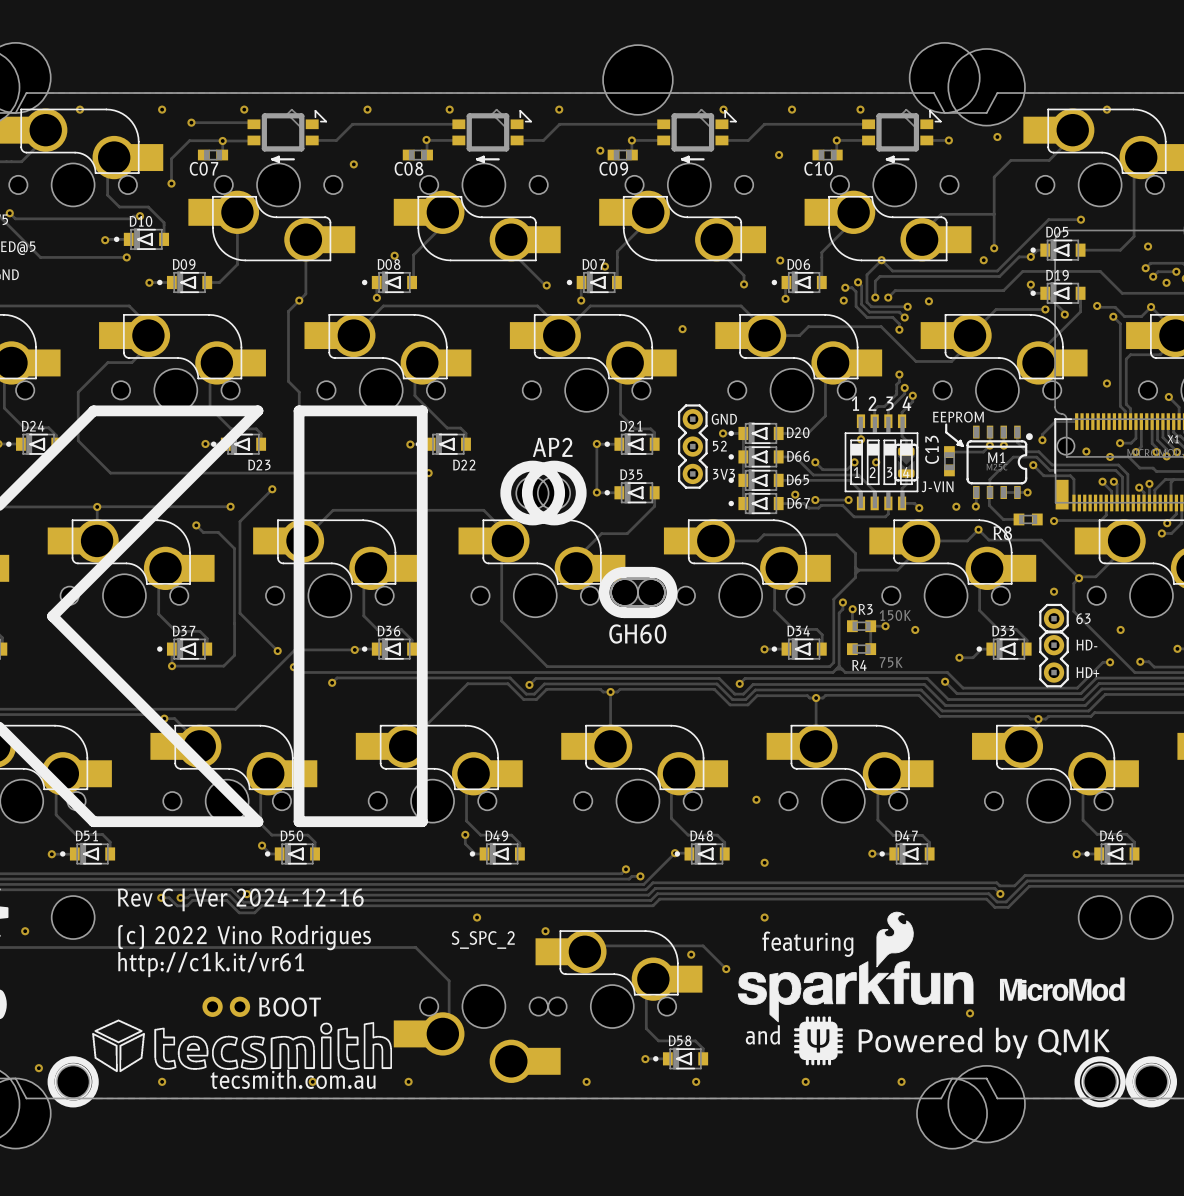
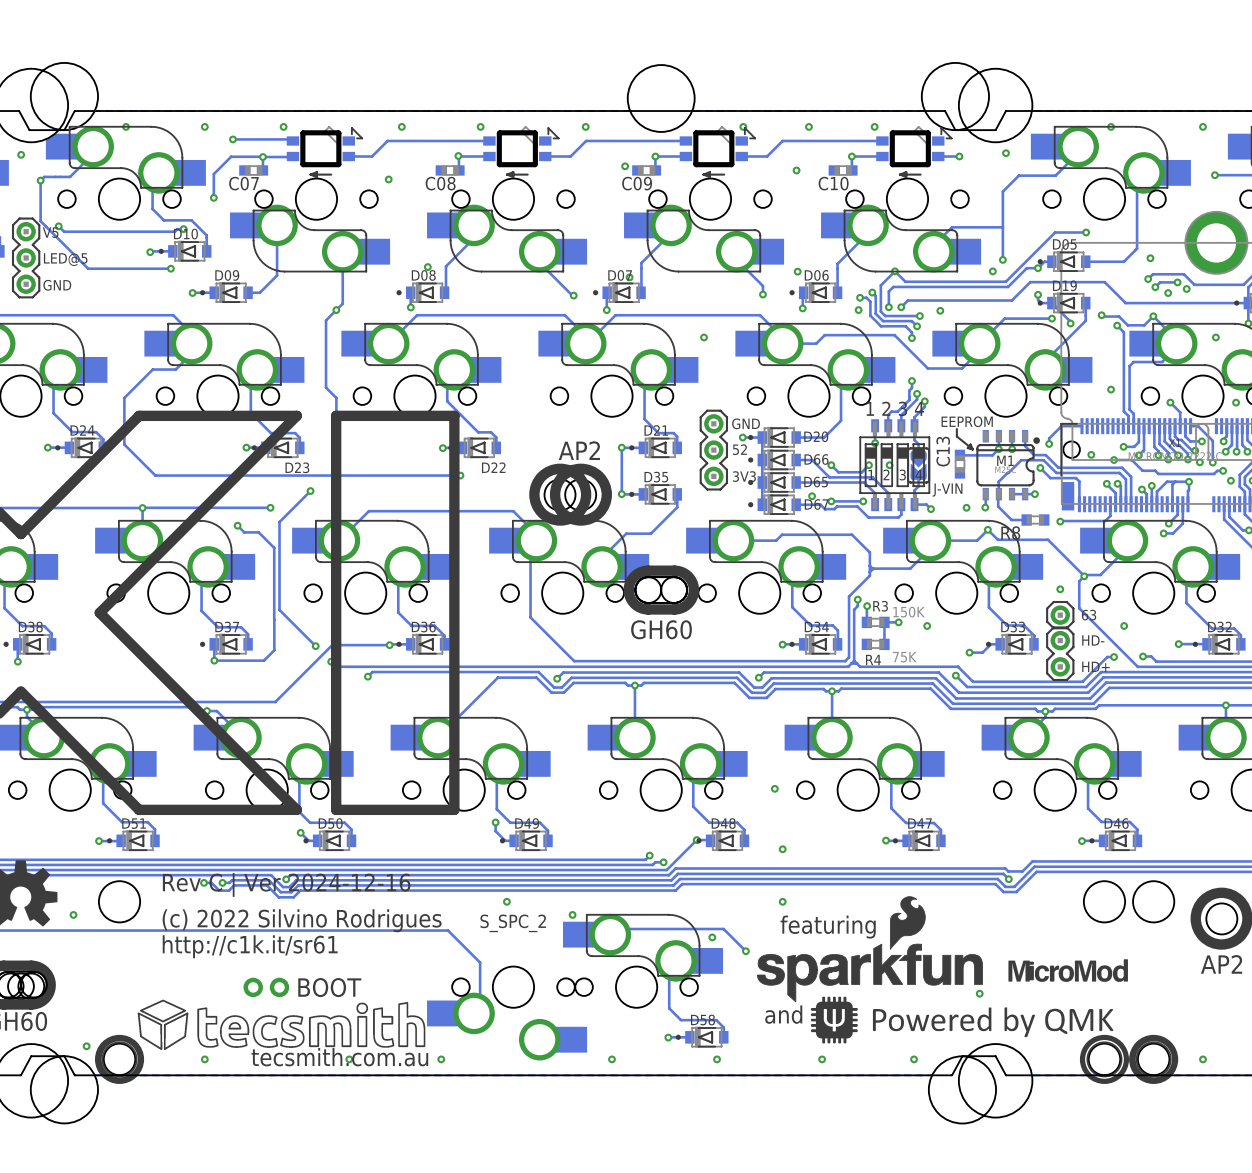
text: (c) 2022 Vino Rodrigues (244, 937) -> (c) 2022 Silvino Rodrigues (302, 920)
text: http://c1k.it/vr61 (211, 964) -> http://c1k.it/sr61 (250, 946)

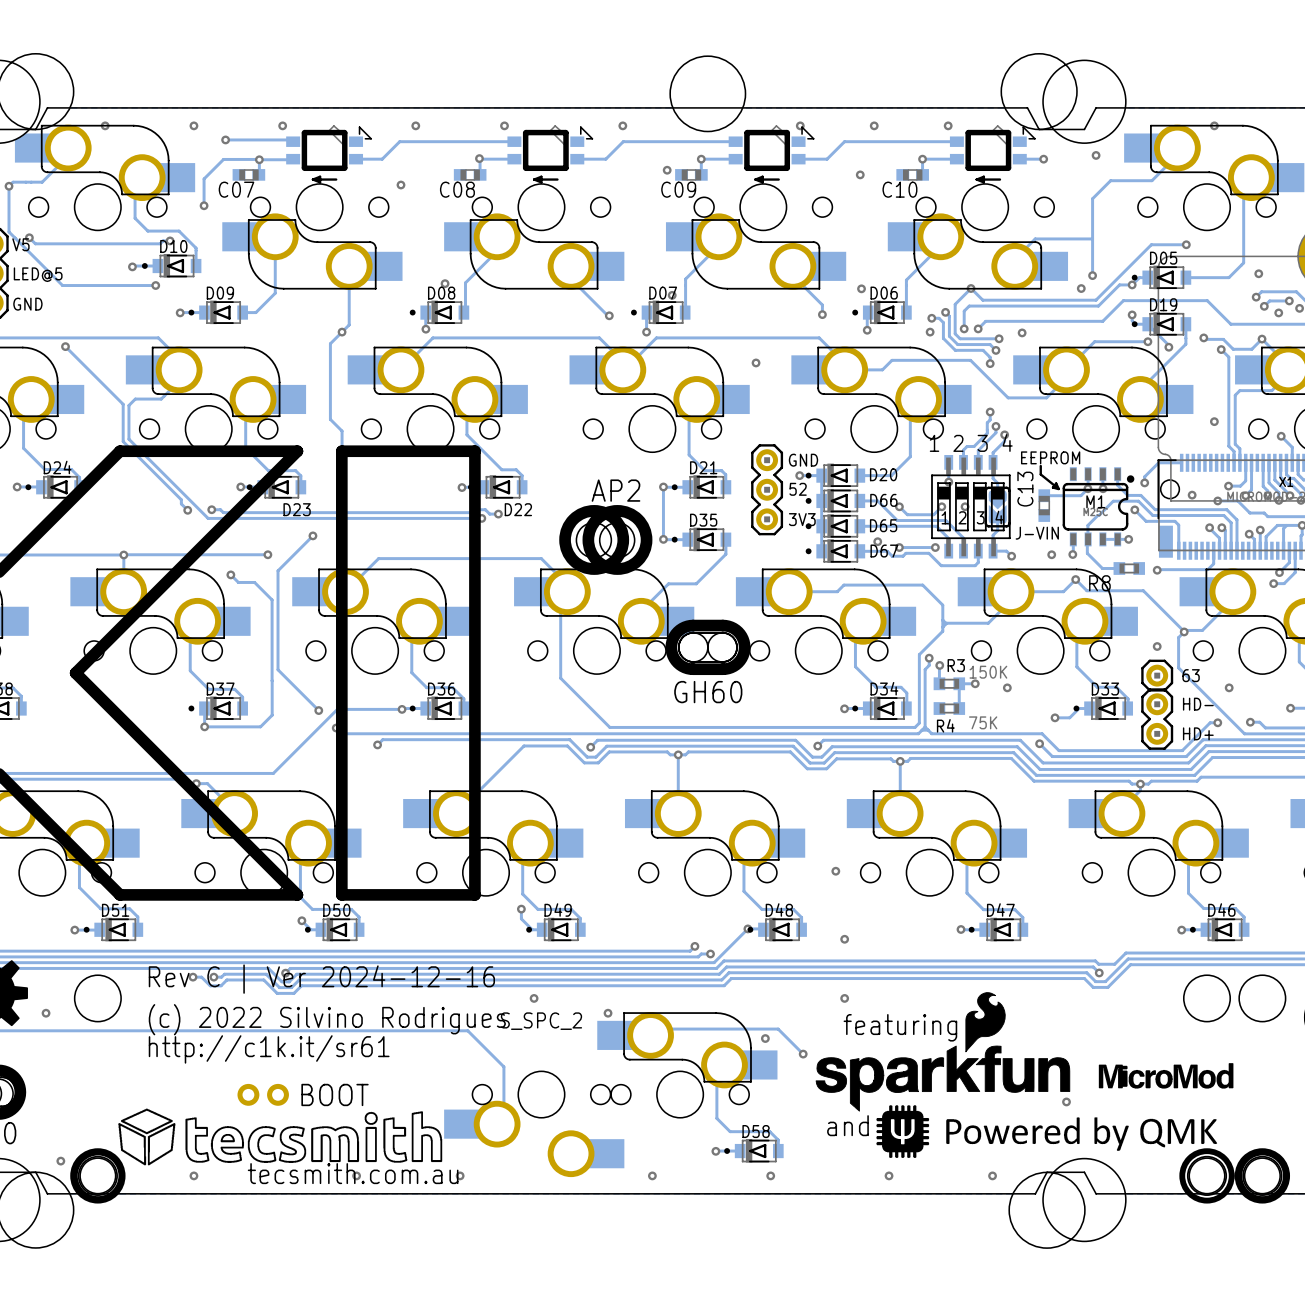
track: none -> (65, 346) (123, 404) (123, 441) (181, 499) (181, 503) (187, 510)
via: none -> (65, 346)
track: (147, 375) (124, 397) (124, 444) (155, 475) (217, 475) -> (128, 405) (128, 439) (208, 518)
track: none -> (211, 509) (220, 509) (223, 512) (475, 512) (478, 509) (485, 509) (489, 514) (498, 514)
via: none -> (211, 509)
via: none -> (187, 510)
via: none -> (498, 514)

